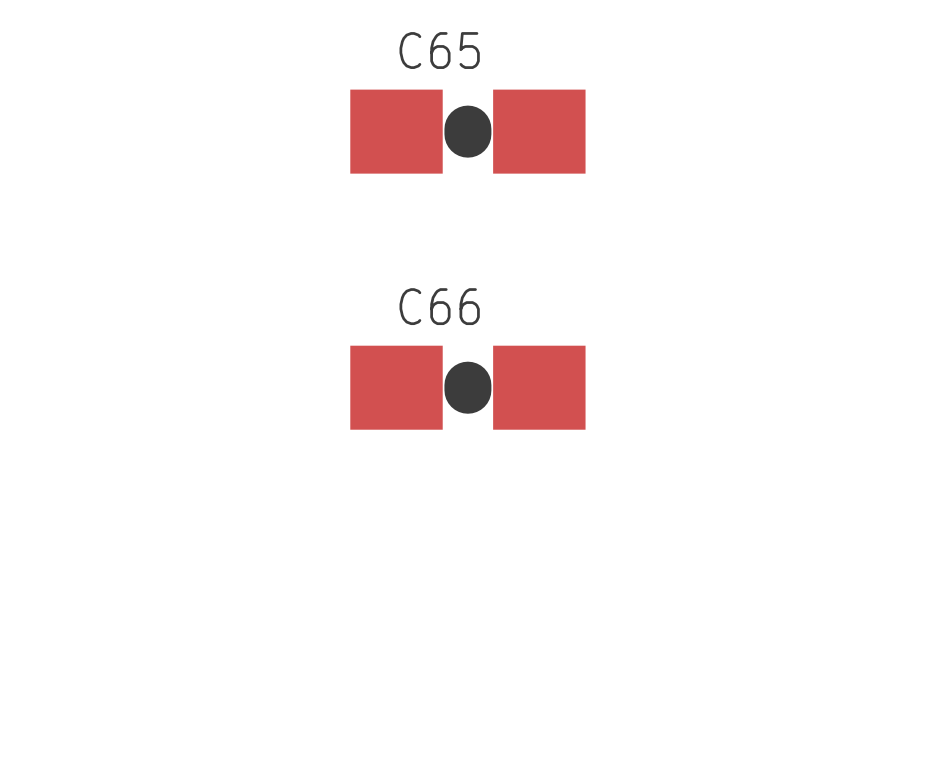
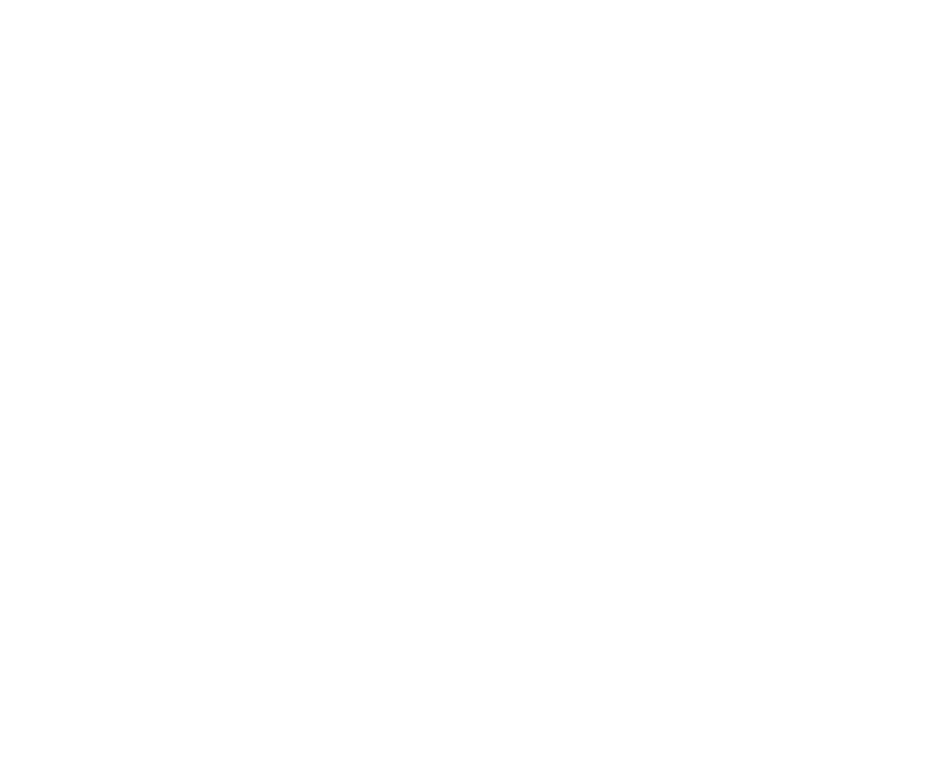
C65: (467, 131) -> none
C66: (467, 387) -> none

